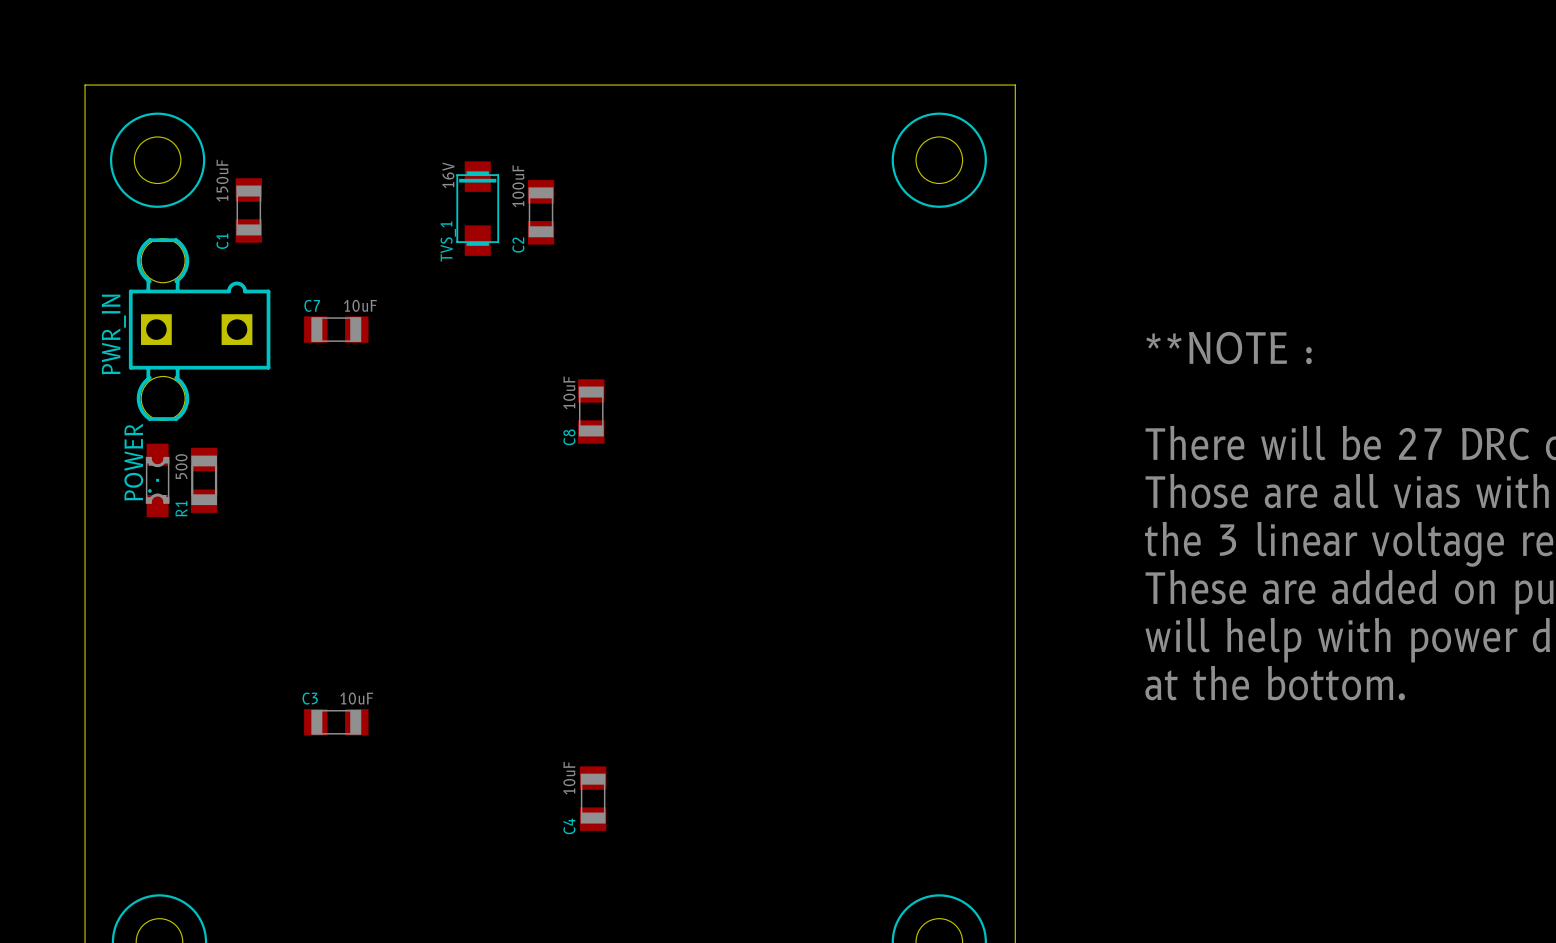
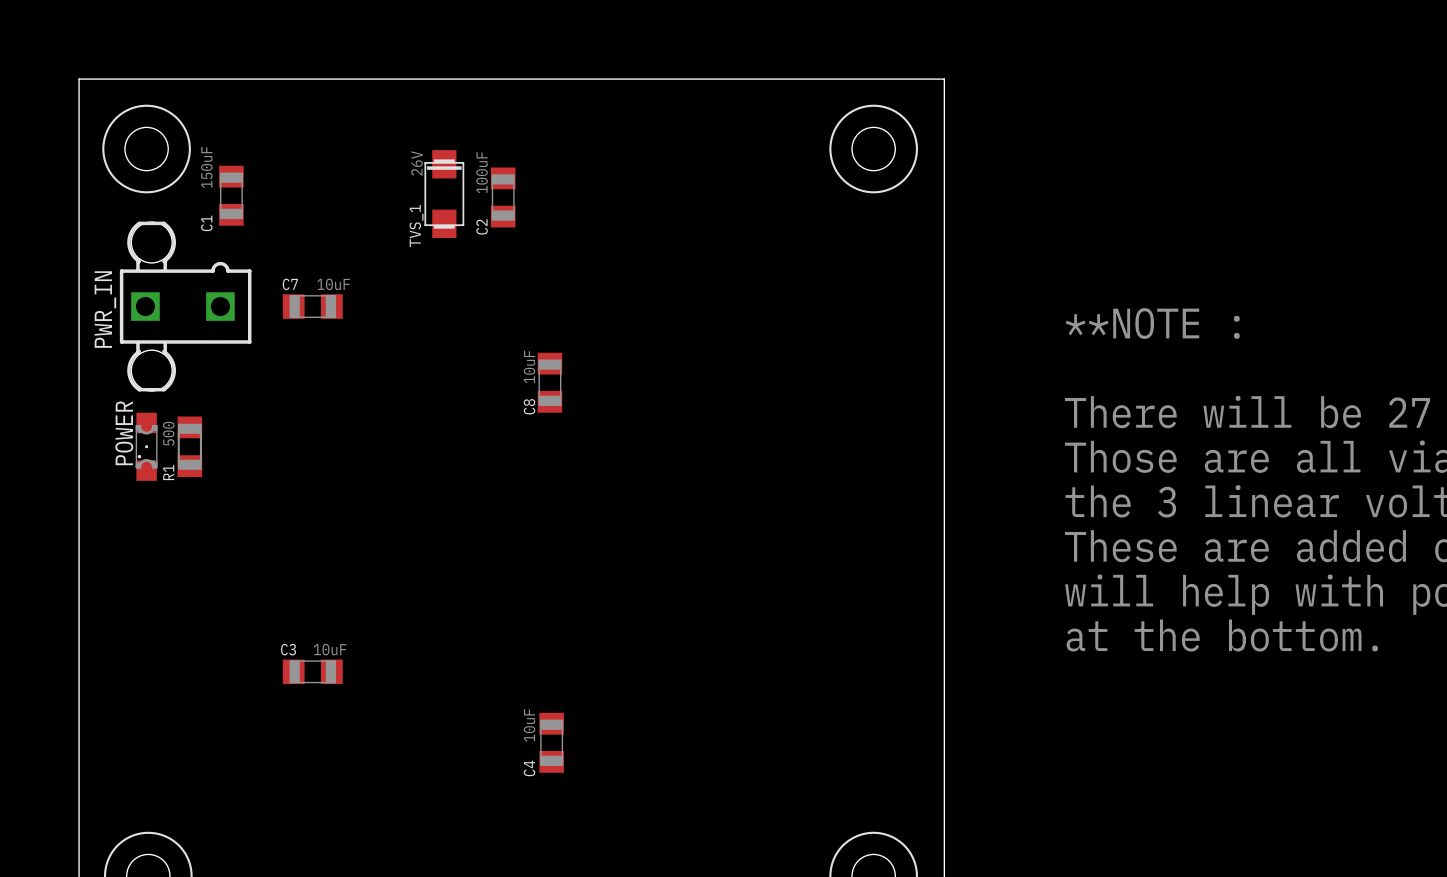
TVS_1 value: 16V (448, 175) -> 26V (416, 163)

